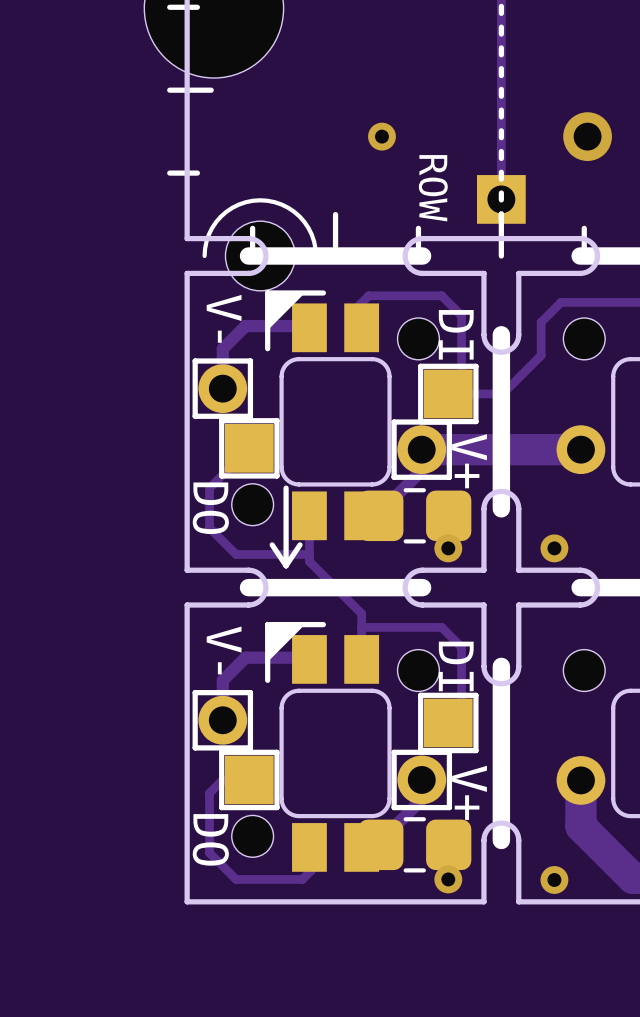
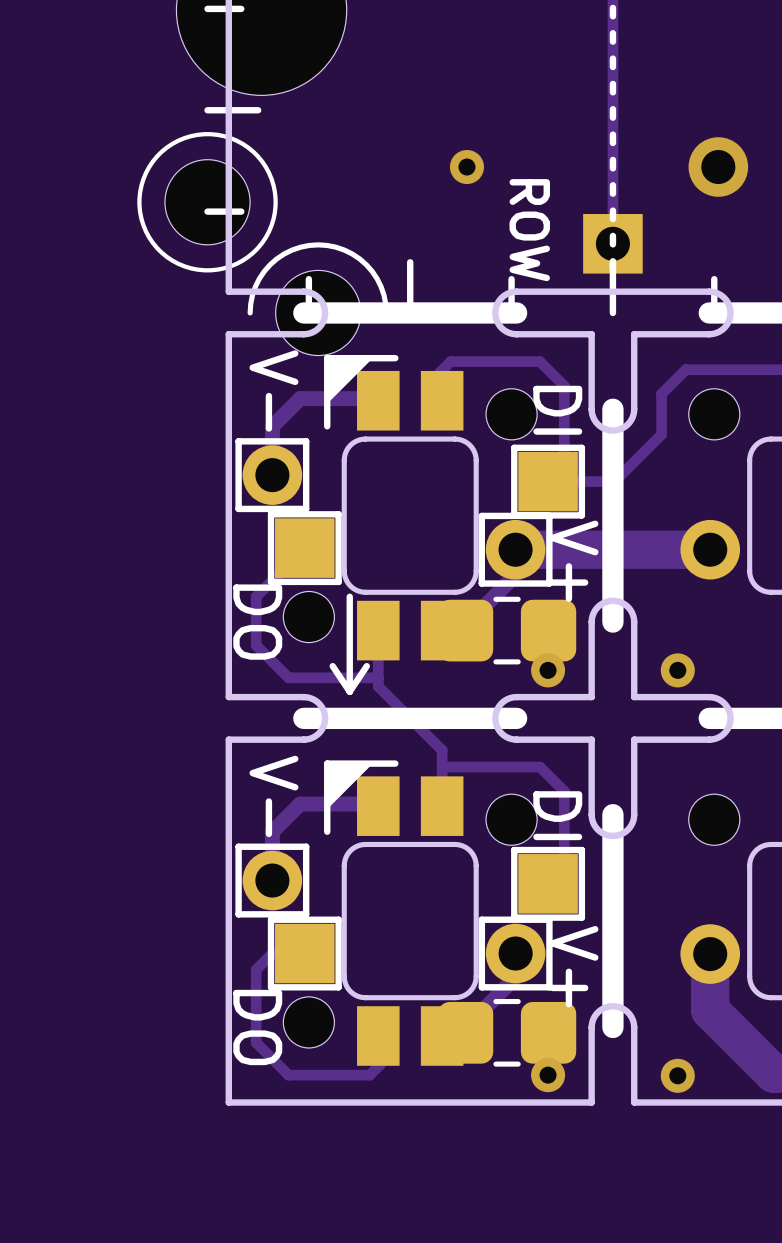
part: none -> (207, 202)

